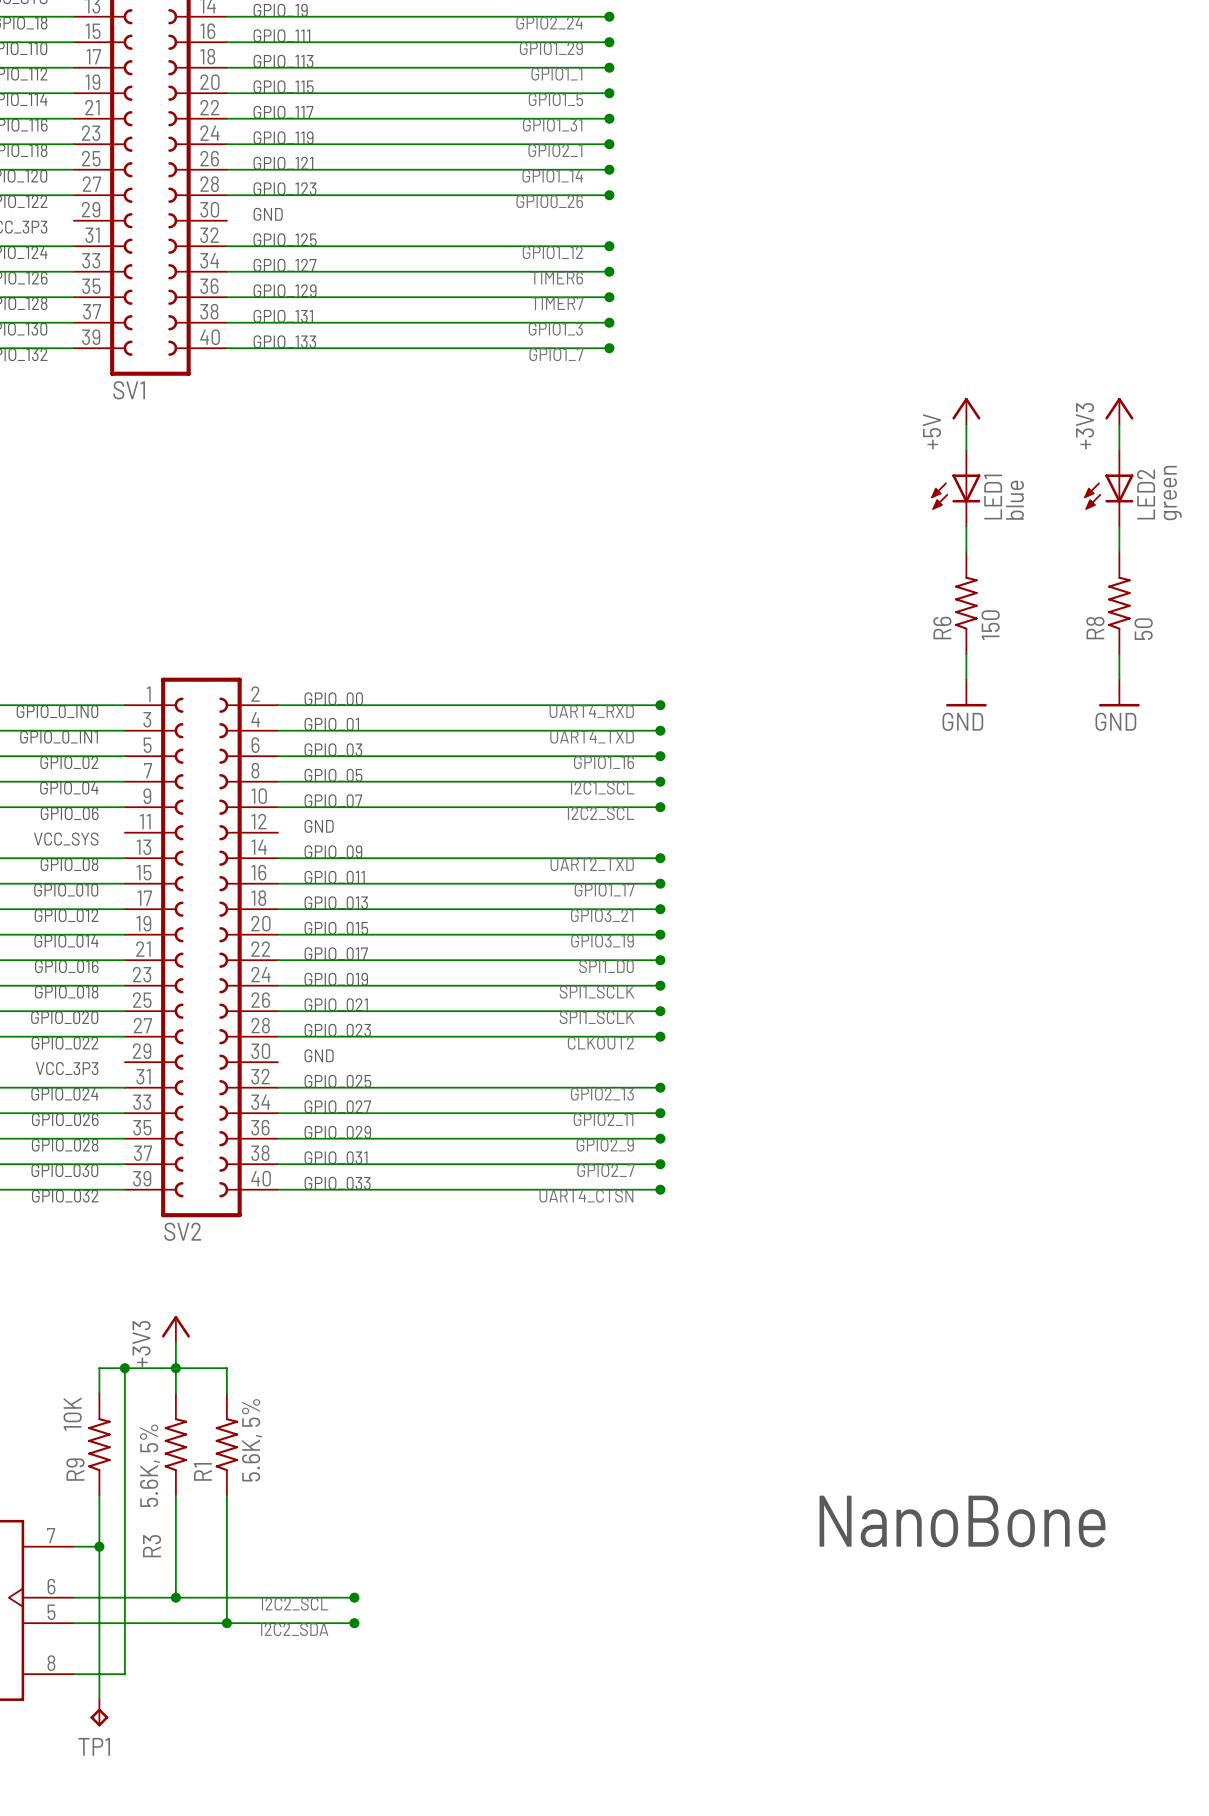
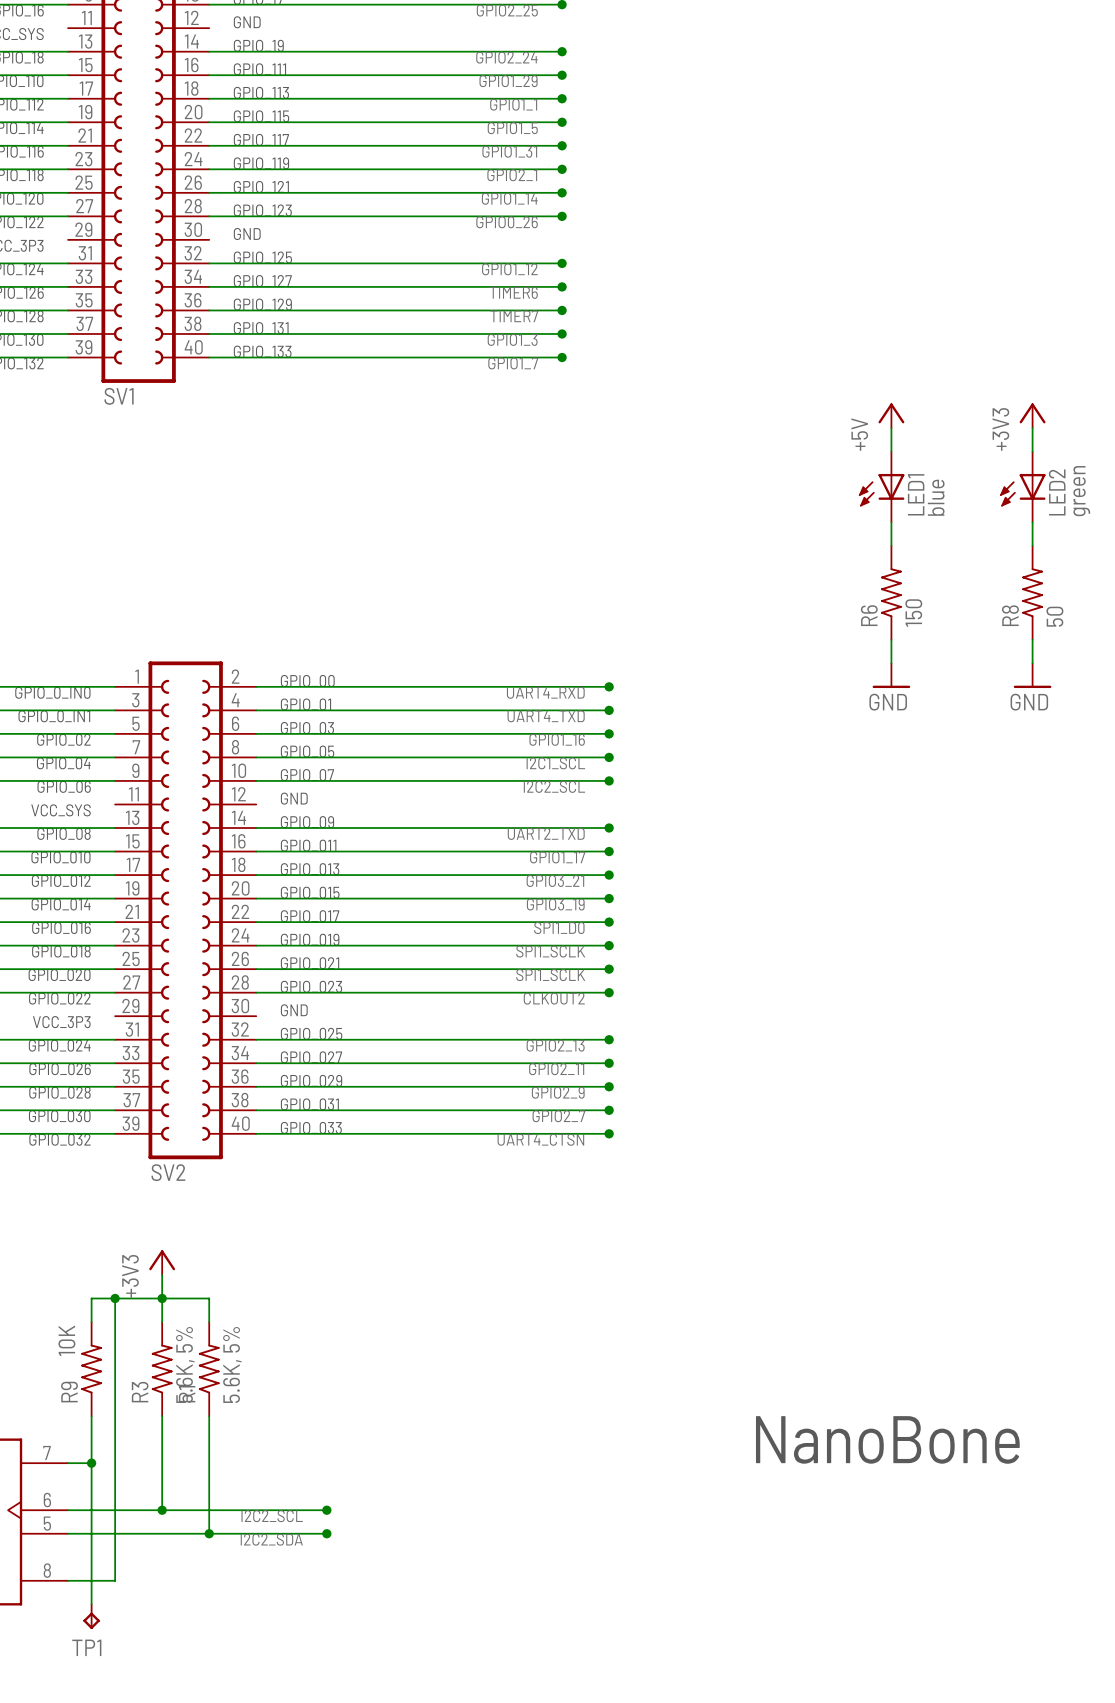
R3 value position: 5.6K, 5% (150, 1465) -> 5.6K, 5% (185, 1365)
R3 name position: R3 (152, 1546) -> R3 (140, 1392)

